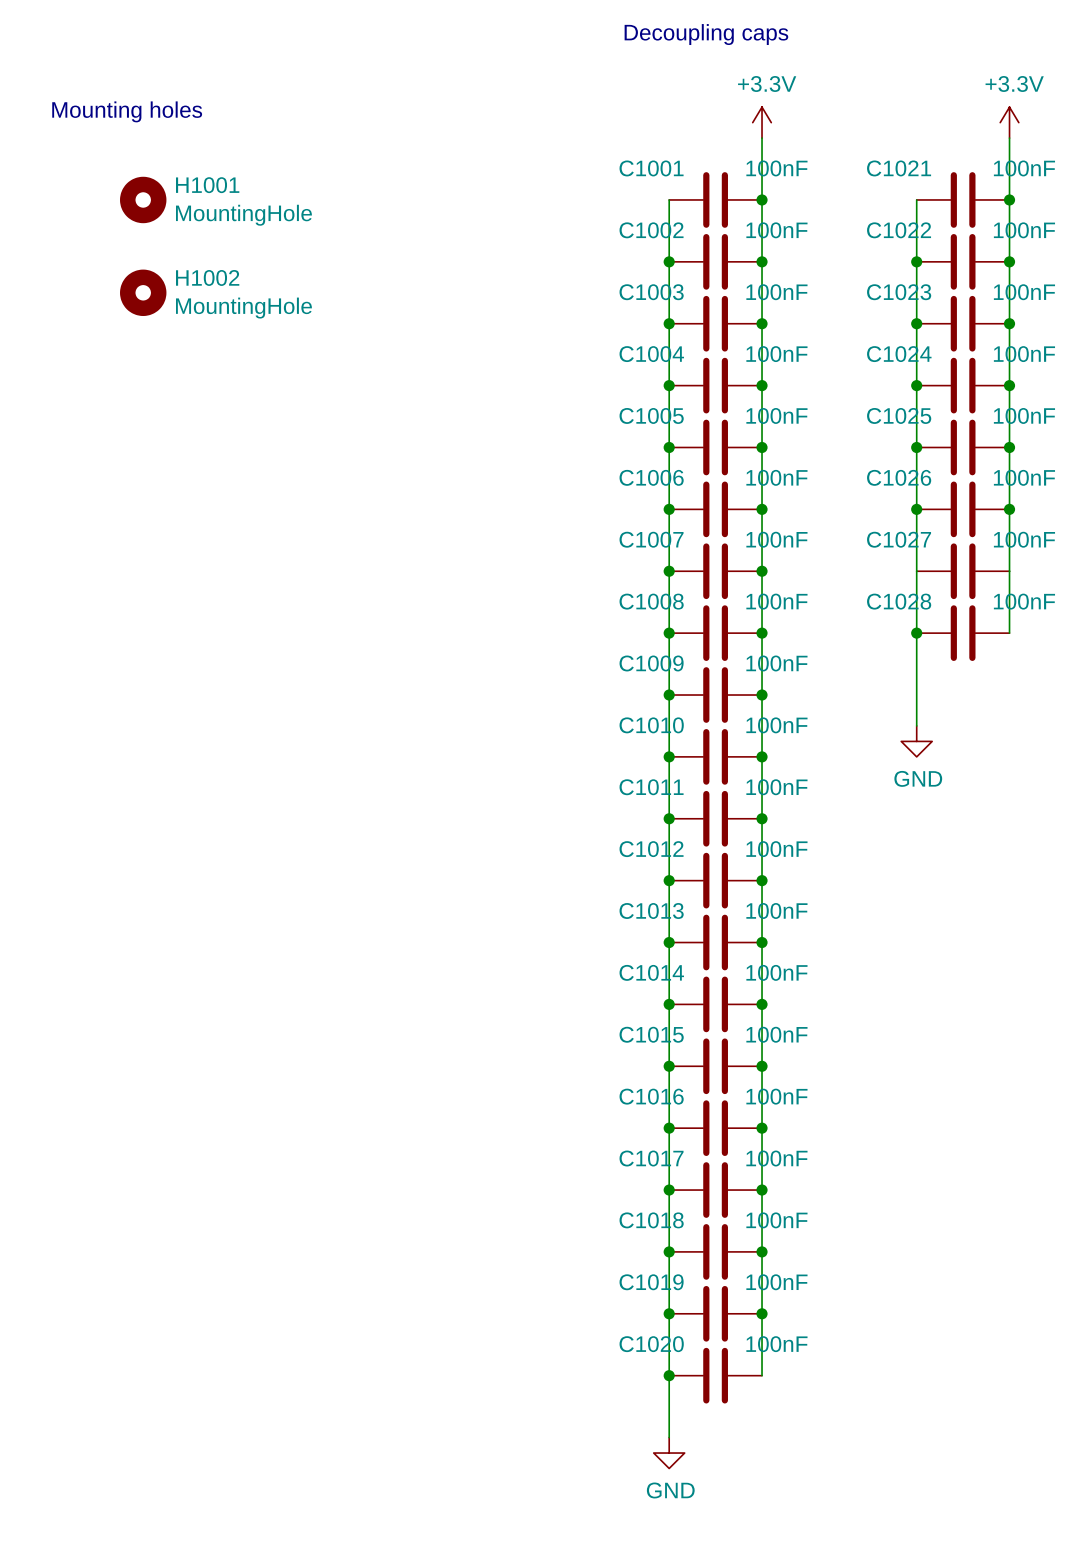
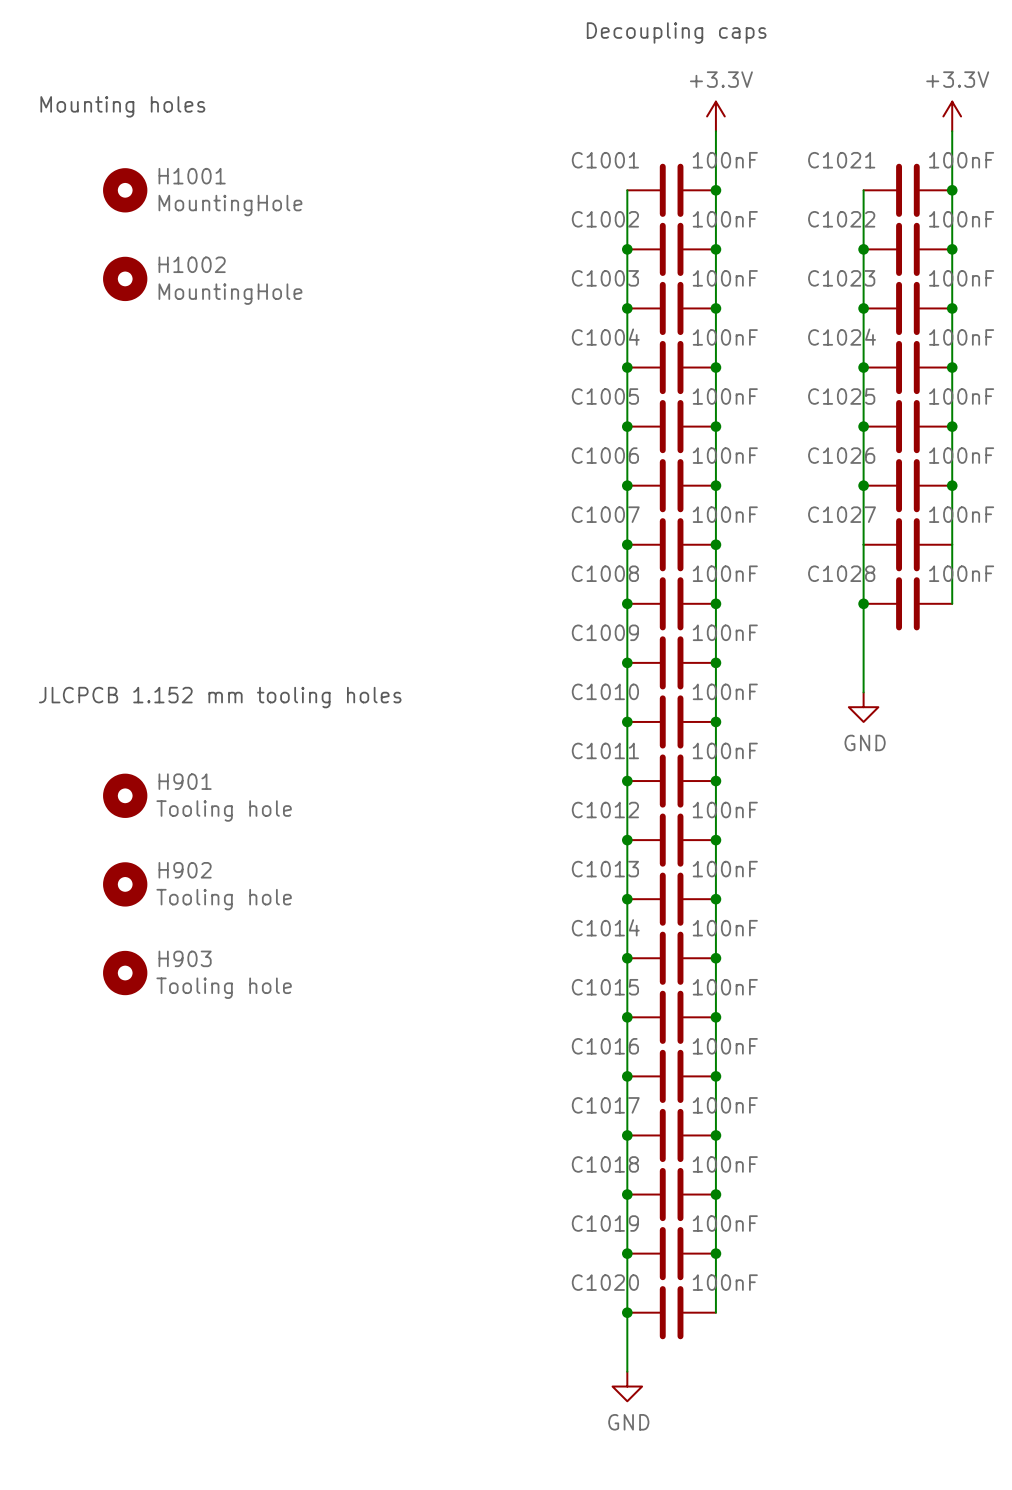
text: none -> JLCPCB 1.152 mm tooling holes (220, 697)
H901: none -> Tooling hole (125, 795)
H902: none -> Tooling hole (125, 884)
H903: none -> Tooling hole (125, 973)

